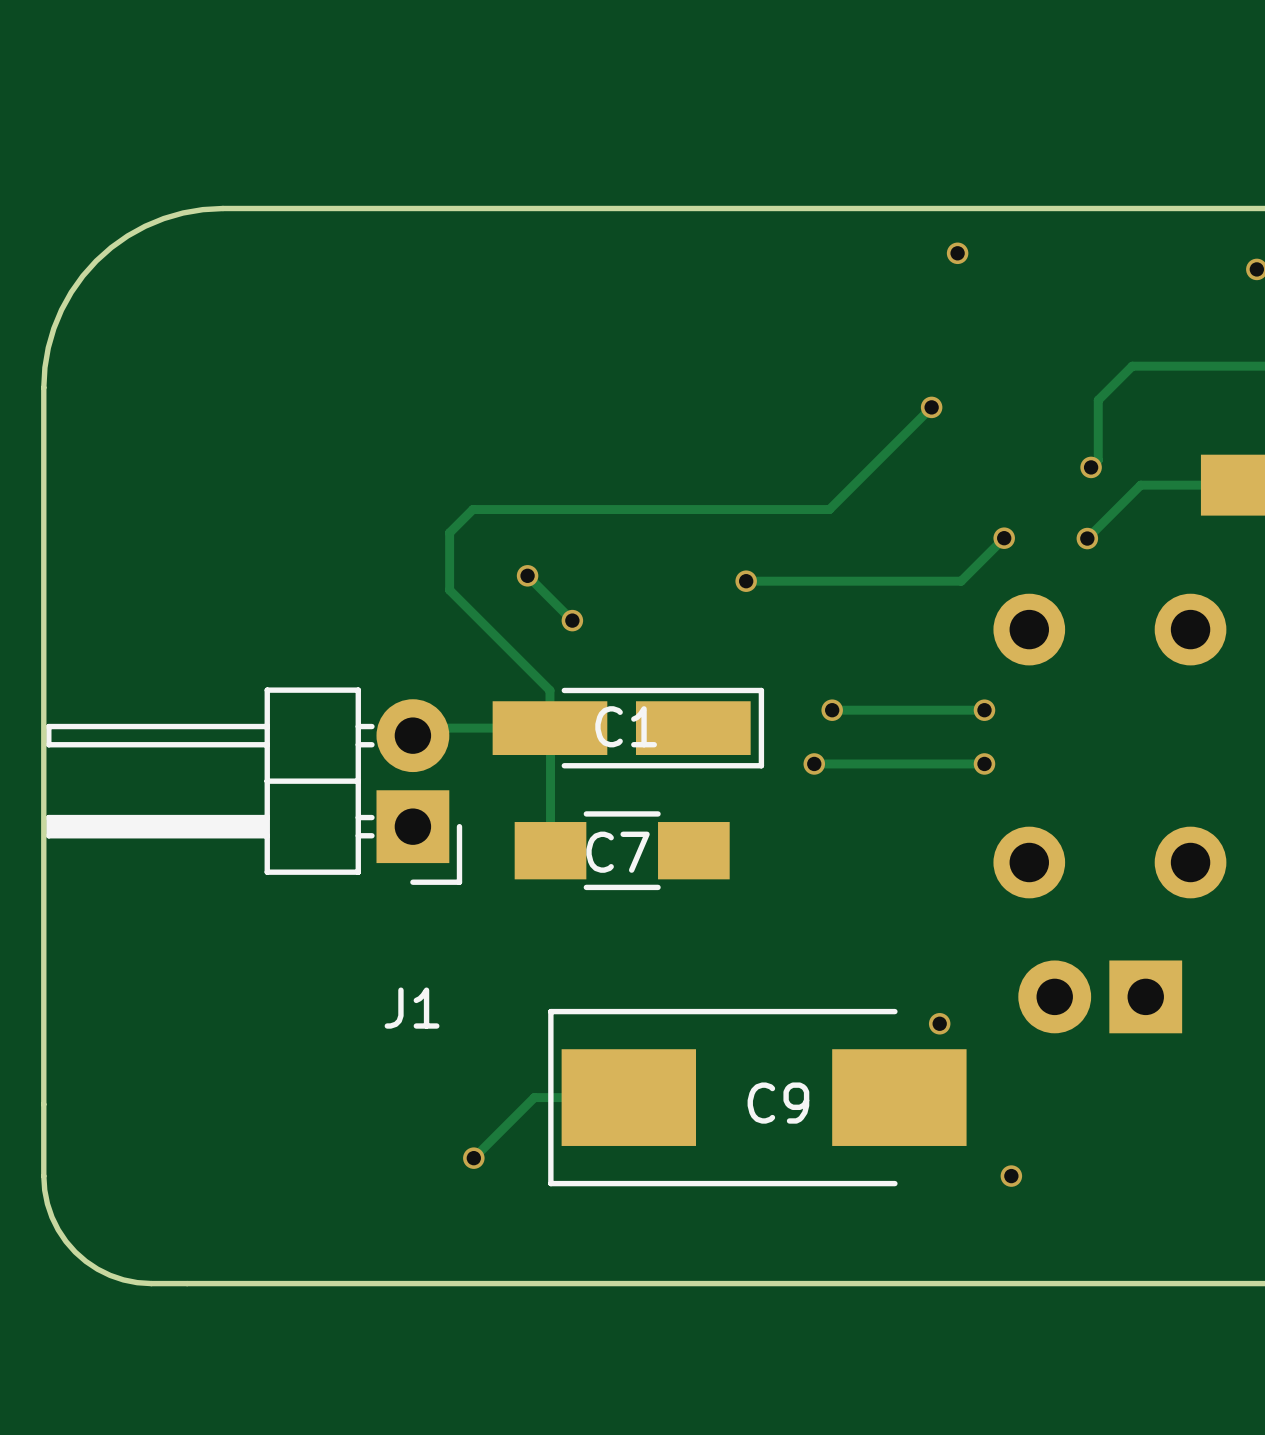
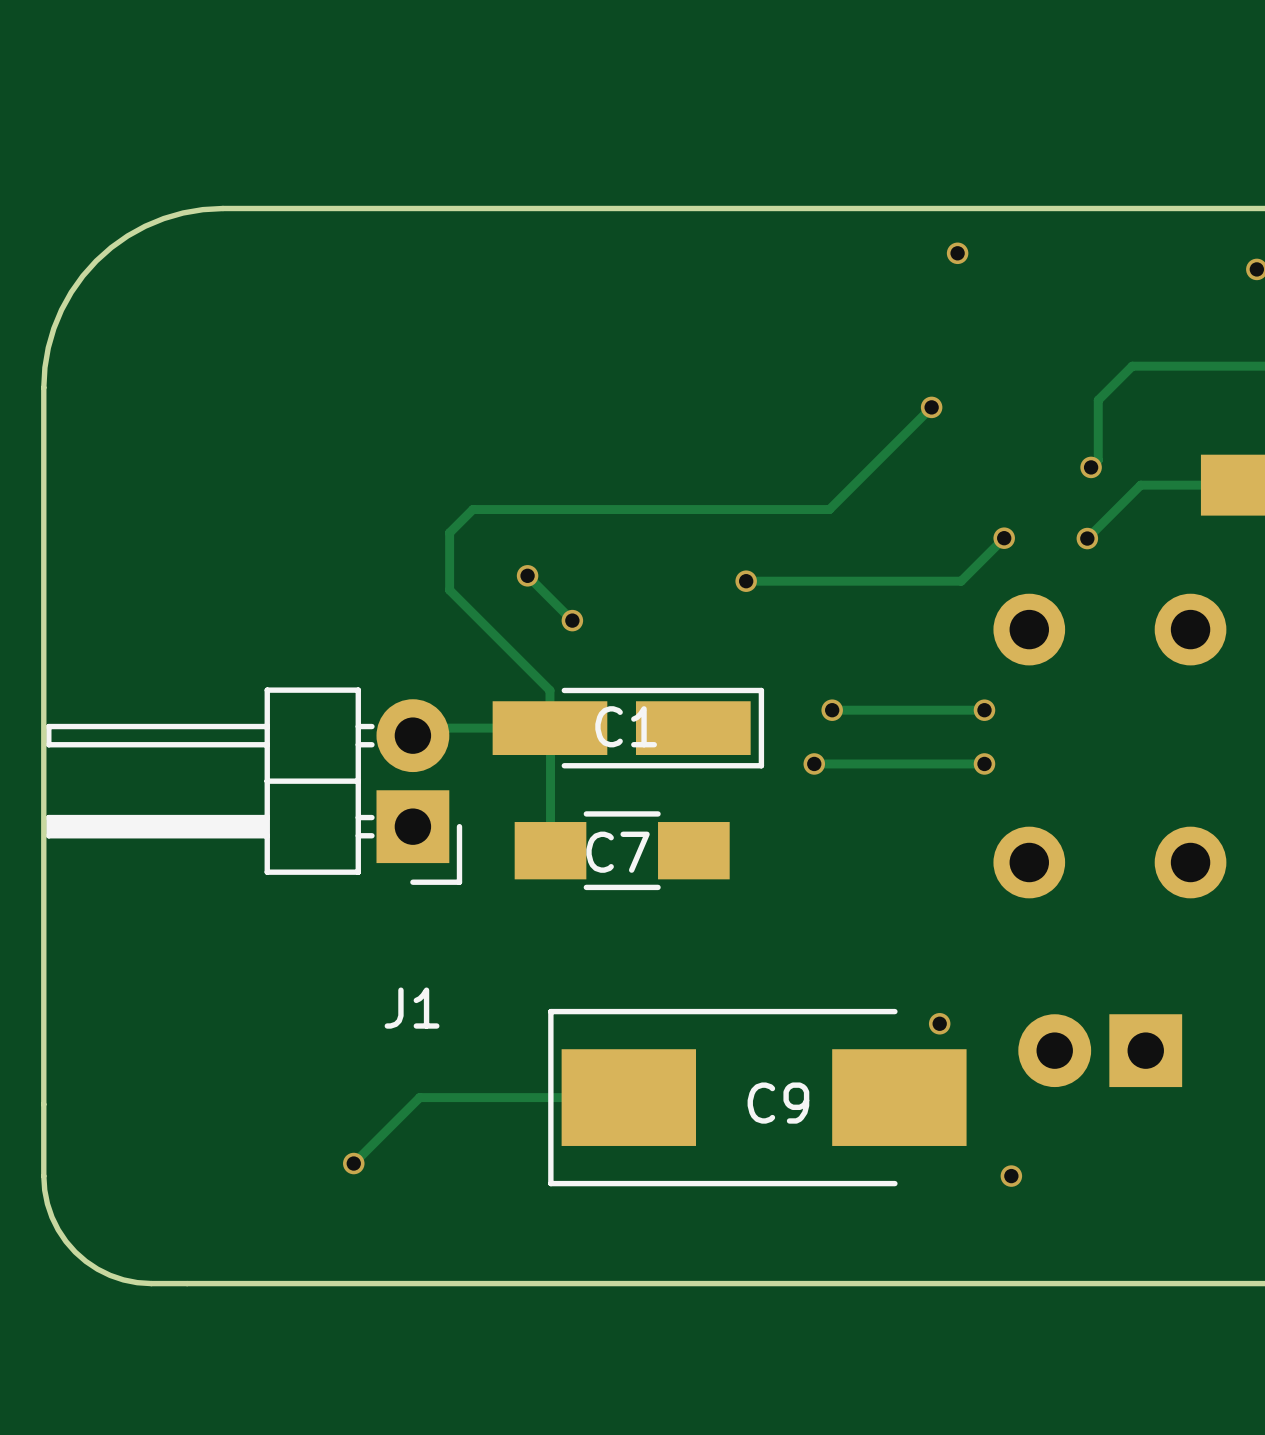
part position: (1100, 996) -> (1100, 1050)
track: (534, 1097) (473, 1158) -> (534, 1097) (419, 1097) (353, 1163)
via position: (473, 1158) -> (353, 1163)

